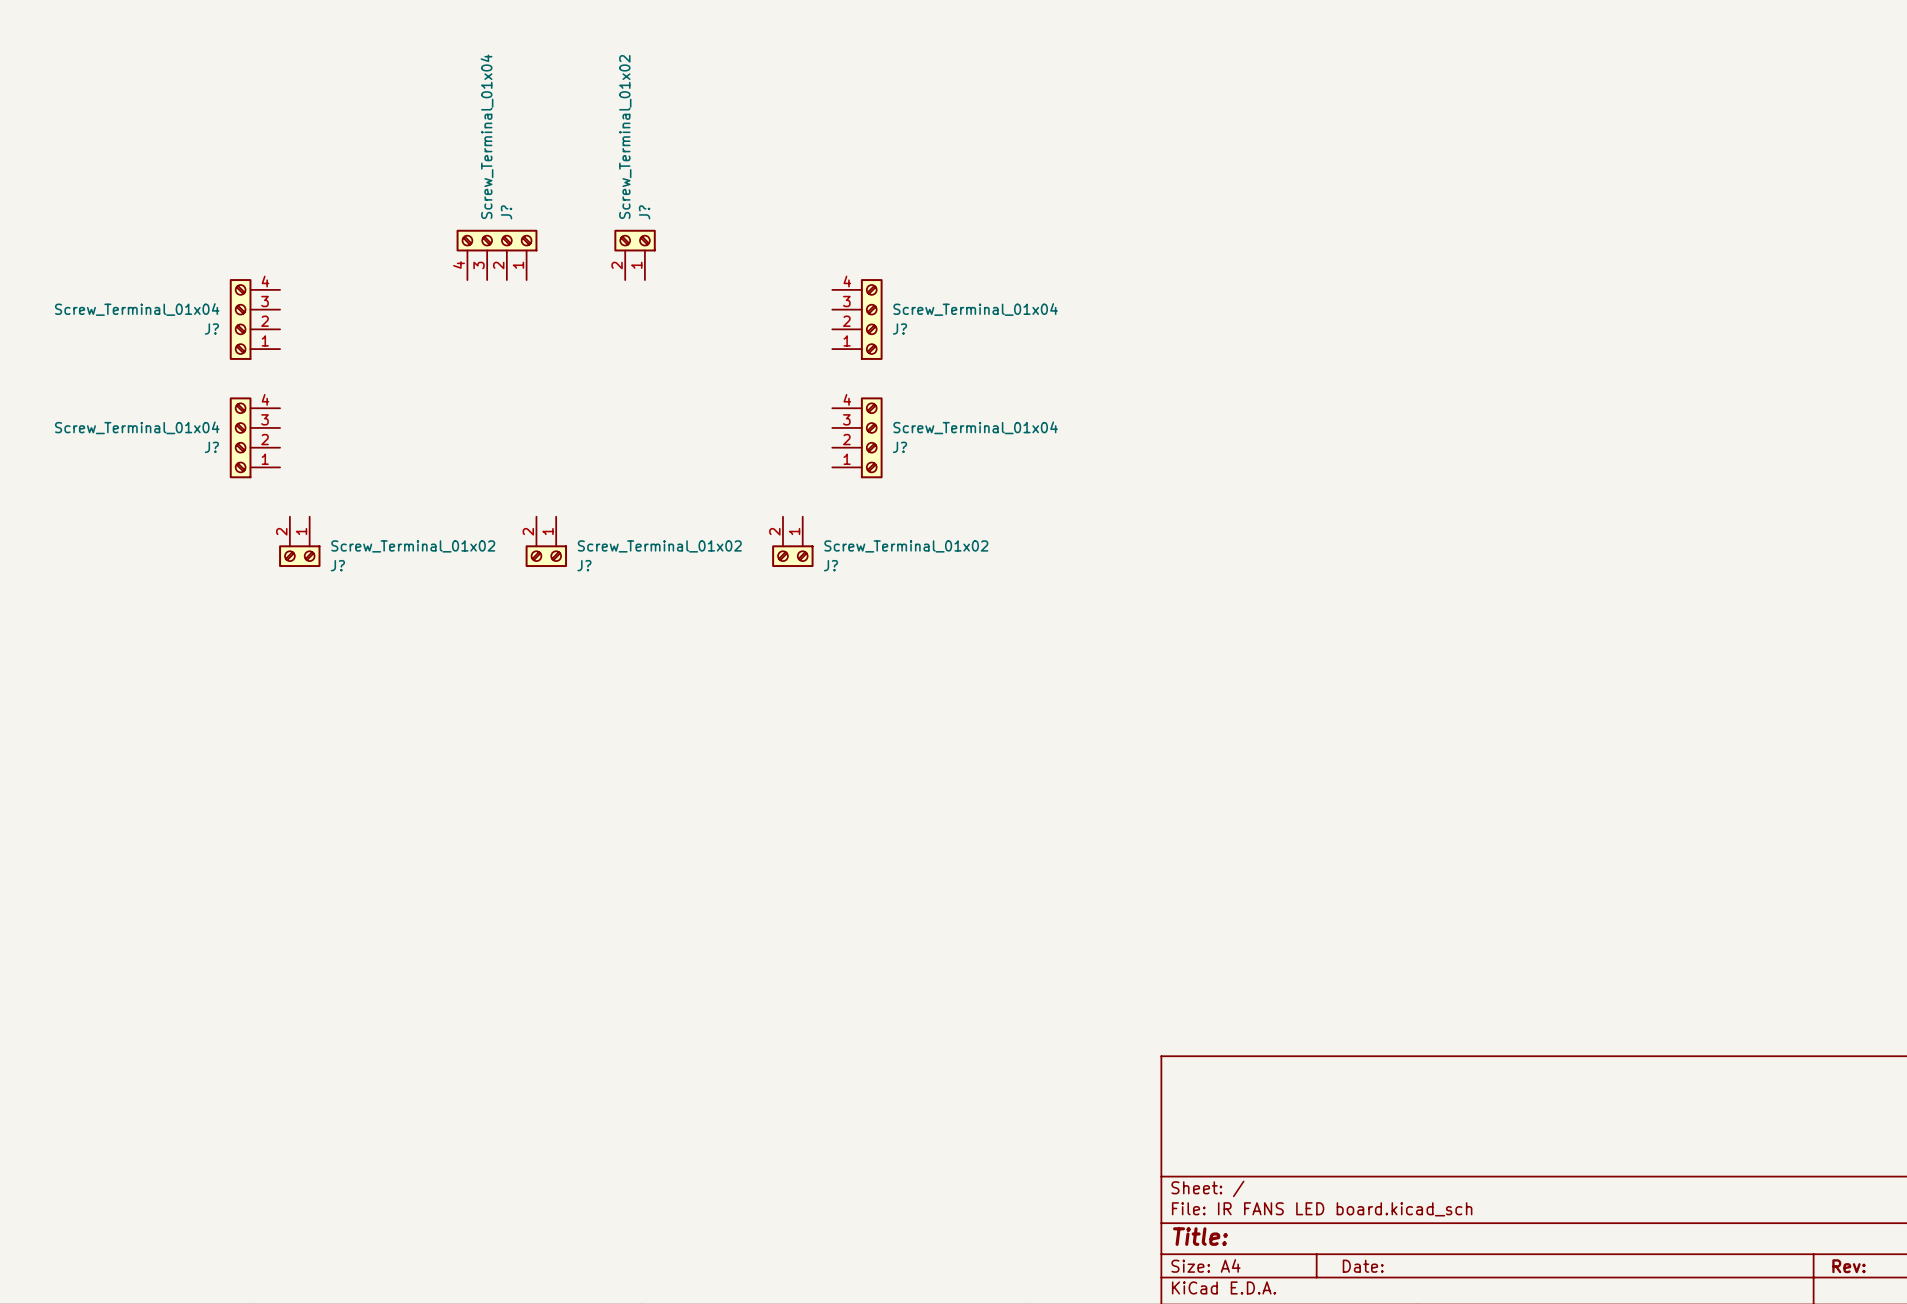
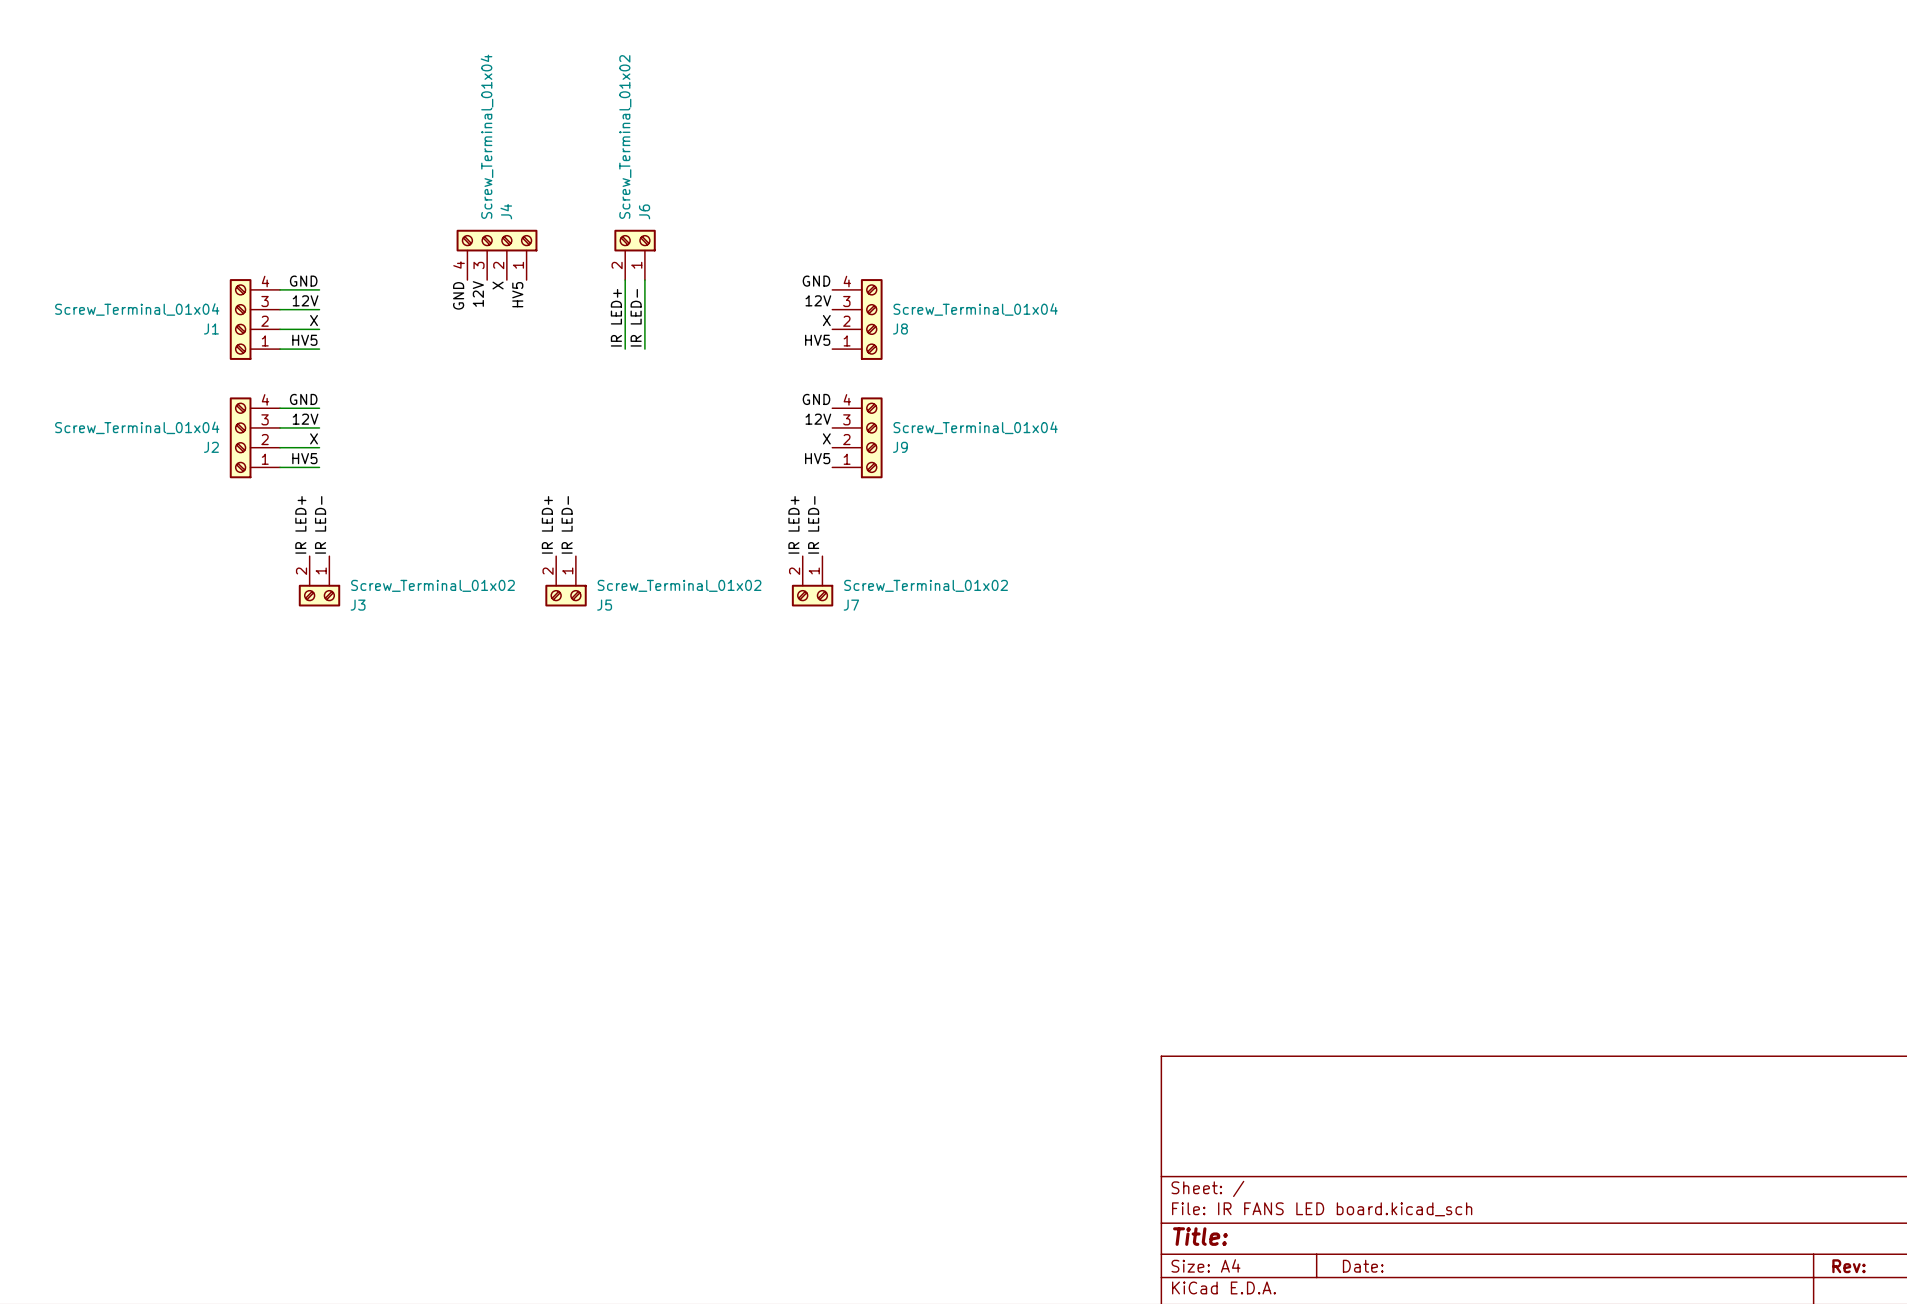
J? name: J? (506, 212) -> J4 (506, 211)
J? name: J? (644, 212) -> J6 (644, 211)
wire: none -> (625, 280) (625, 349)
wire: none -> (644, 280) (644, 349)
label: none -> GND (303, 281)
label: none -> GND (816, 281)
label: none -> X (498, 285)
wire: none -> (280, 289) (319, 289)
label: none -> 12V (478, 293)
label: none -> HV5 (517, 294)
label: none -> GND (458, 295)
label: none -> 12V (305, 300)
label: none -> 12V (818, 300)
wire: none -> (280, 309) (319, 309)
label: none -> IR LED+ (616, 317)
label: none -> IR LED- (636, 317)
label: none -> X (314, 320)
label: none -> X (826, 320)
J? name: J? (211, 328) -> J1 (211, 328)
J? name: J? (899, 328) -> J8 (900, 328)
wire: none -> (280, 329) (319, 329)
label: none -> HV5 (304, 340)
label: none -> HV5 (817, 340)
wire: none -> (280, 349) (319, 349)
label: none -> GND (303, 399)
label: none -> GND (816, 399)
wire: none -> (280, 408) (319, 408)
label: none -> 12V (305, 419)
label: none -> 12V (818, 419)
wire: none -> (280, 427) (319, 427)
label: none -> X (314, 438)
label: none -> X (826, 438)
J? name: J? (211, 447) -> J2 (211, 447)
wire: none -> (280, 447) (319, 447)
J? name: J? (899, 447) -> J9 (900, 447)
label: none -> HV5 (304, 458)
label: none -> HV5 (817, 458)
wire: none -> (280, 467) (319, 467)
label: none -> IR LED+ (300, 524)
label: none -> IR LED- (320, 524)
label: none -> IR LED+ (547, 524)
label: none -> IR LED- (567, 524)
label: none -> IR LED+ (793, 524)
label: none -> IR LED- (813, 524)
J?: Screw_Terminal_01x02 (299, 541) -> none
J?: Screw_Terminal_01x02 (546, 541) -> none
J?: Screw_Terminal_01x02 (792, 541) -> none
J3: none -> Screw_Terminal_01x02 (319, 581)
J5: none -> Screw_Terminal_01x02 (566, 581)
J7: none -> Screw_Terminal_01x02 (812, 581)

